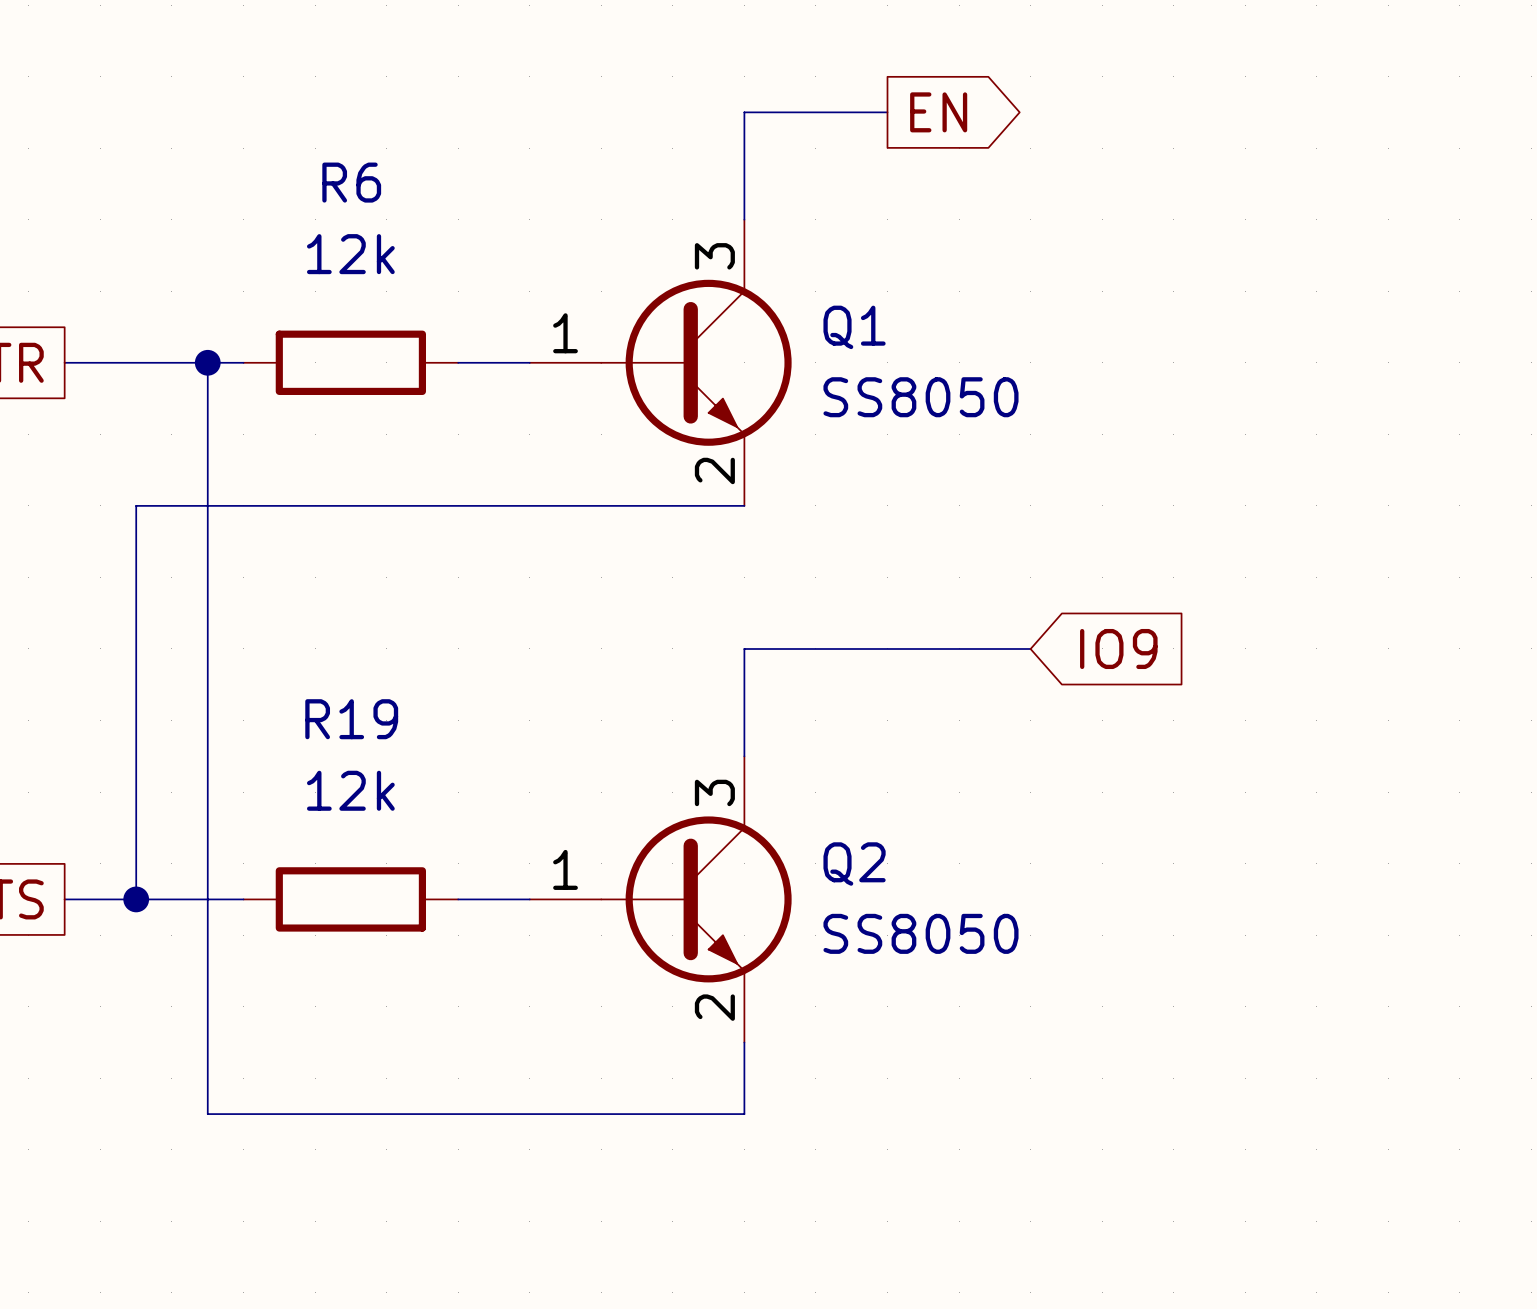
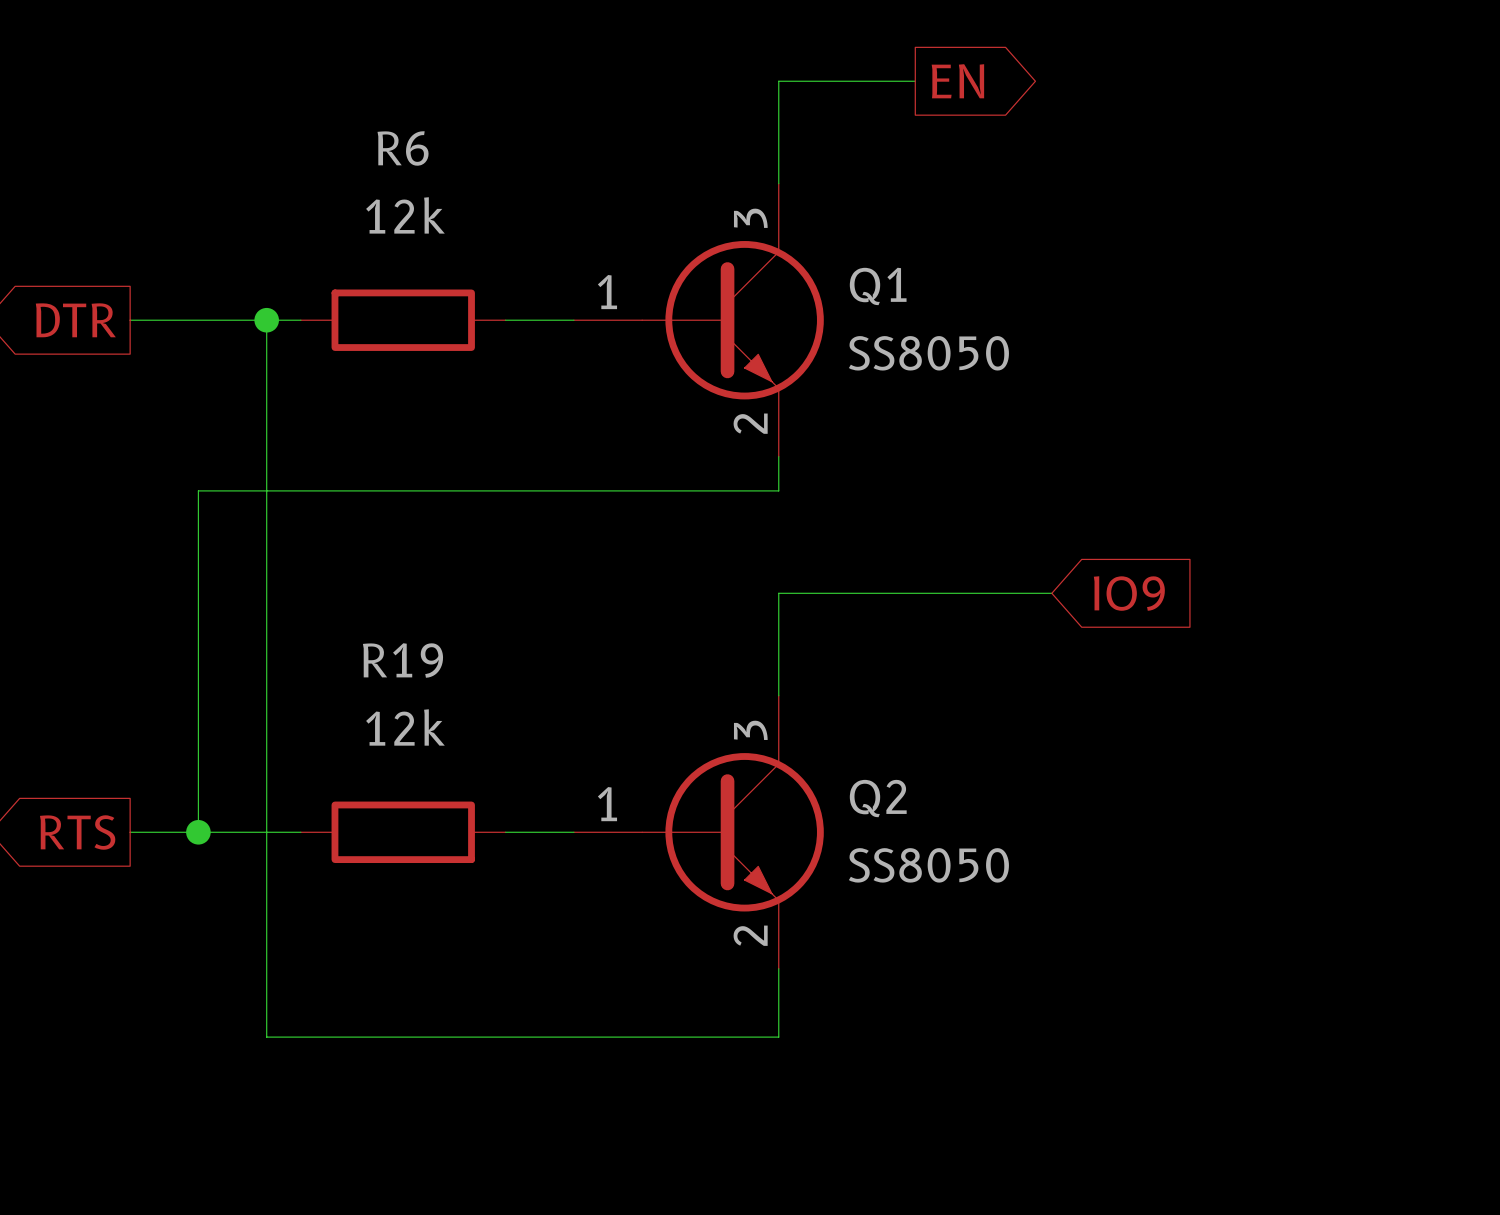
wire: (744, 505) (136, 505) (136, 541) -> (778, 456) (778, 490) (198, 490)

